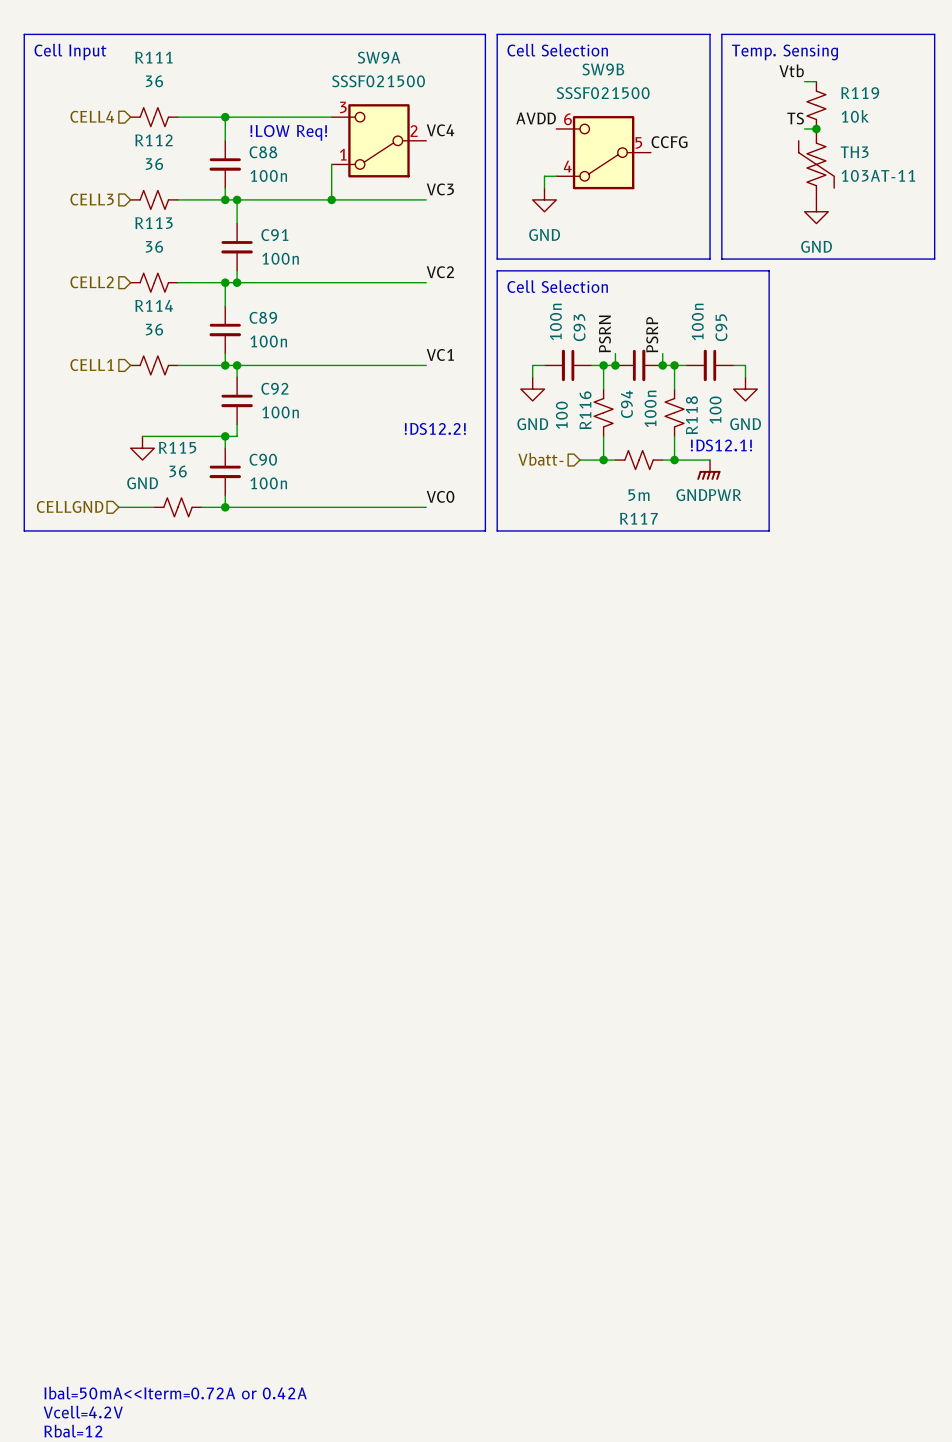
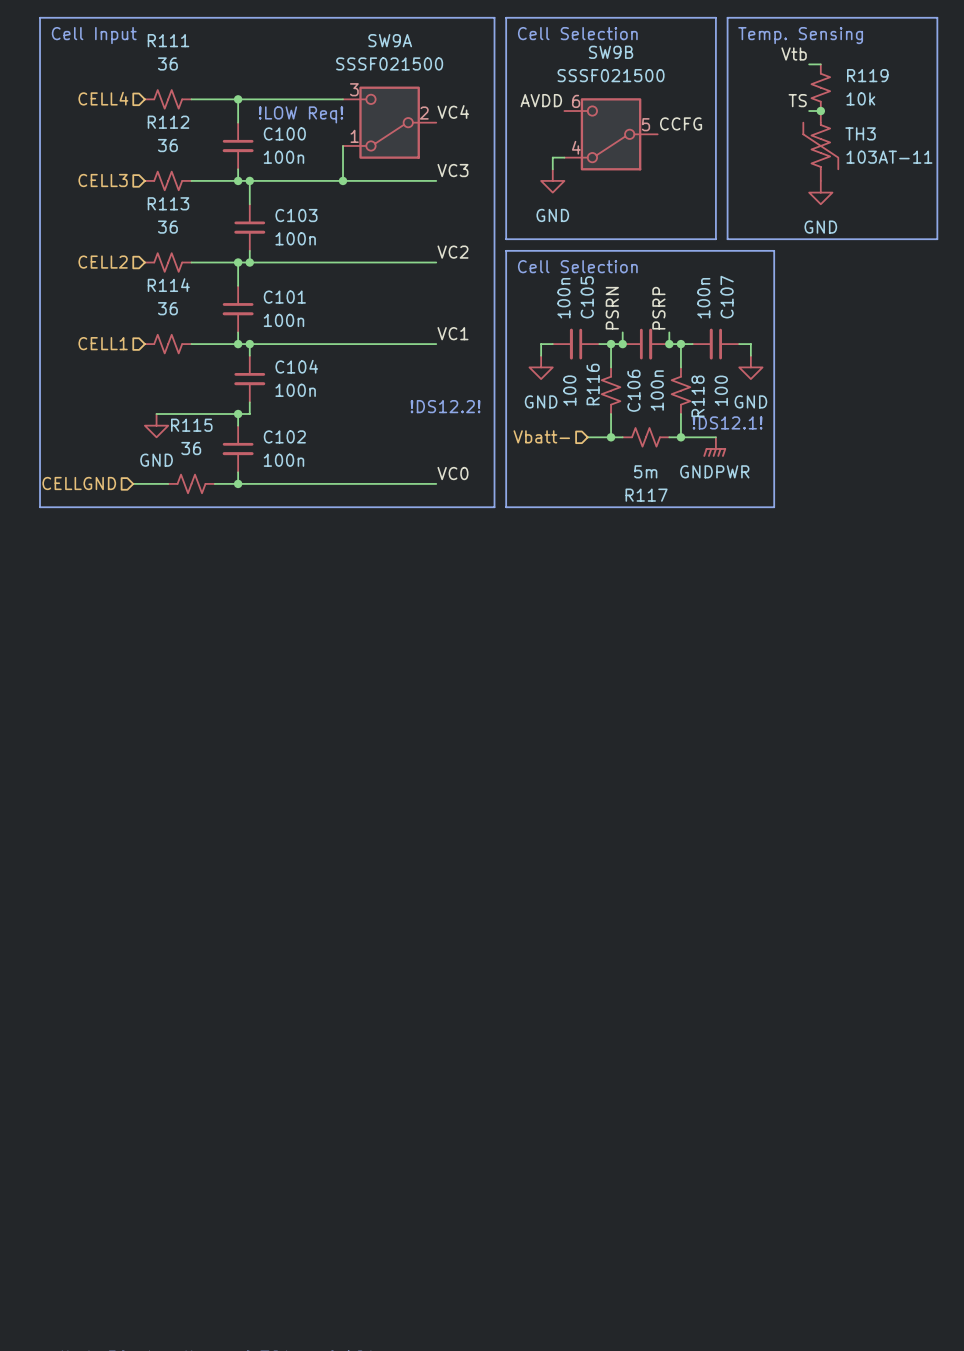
C88 name: C88 (263, 152) -> C100 (284, 133)
C91 name: C91 (274, 235) -> C103 (296, 215)
C89 name: C89 (263, 317) -> C101 (284, 297)
C93 name: C93 (579, 327) -> C105 (587, 297)
C95 name: C95 (721, 327) -> C107 (727, 297)
C92 name: C92 (274, 388) -> C104 (296, 366)
C94 name: C94 (626, 404) -> C106 (633, 390)
C90 name: C90 (263, 459) -> C102 (284, 436)

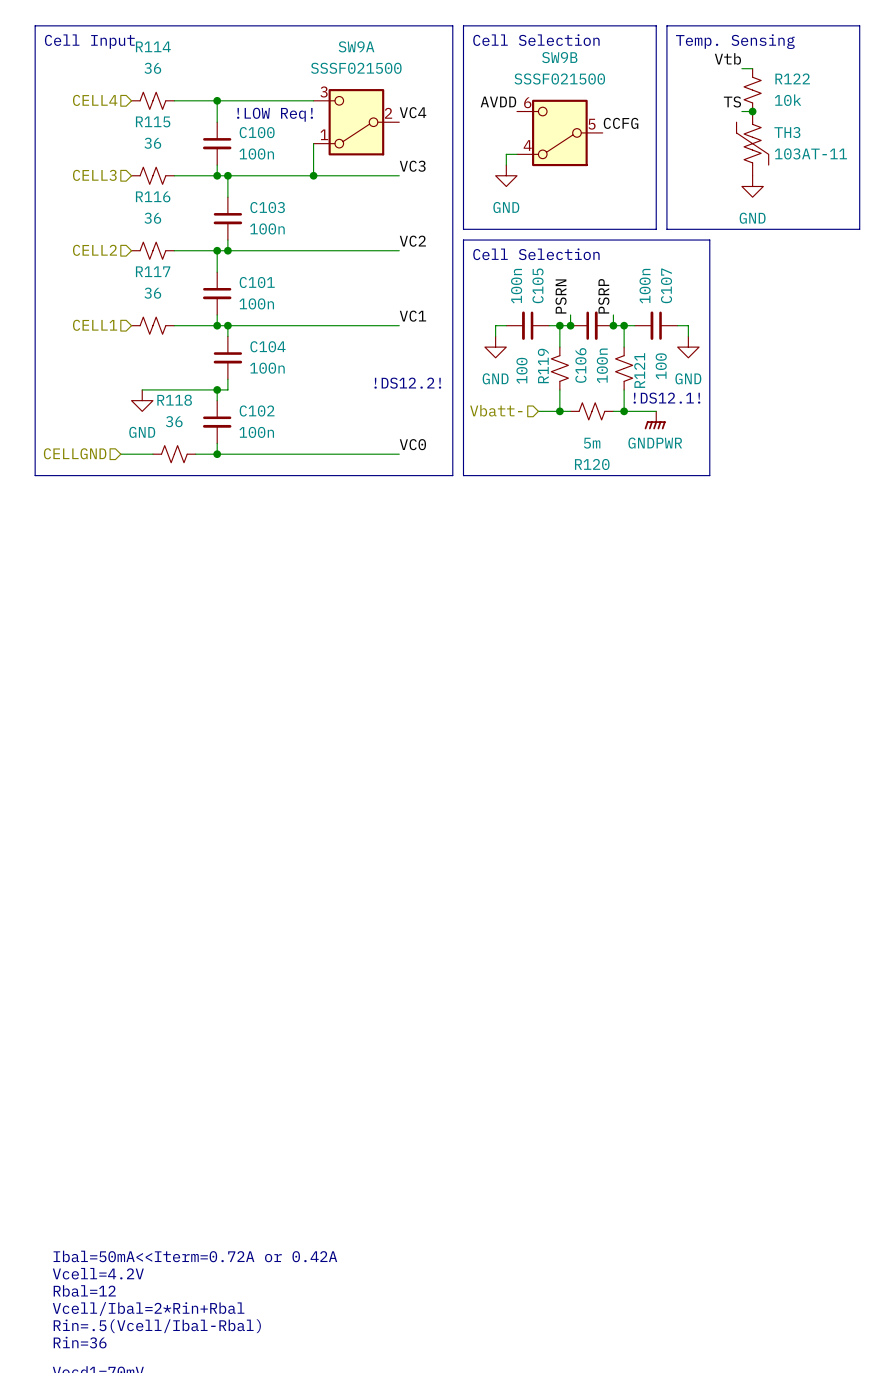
R111 name: R111 (168, 40) -> R114 (153, 46)
R119 name: R119 (867, 75) -> R122 (792, 78)
R112 name: R112 (168, 122) -> R115 (153, 121)
R113 name: R113 (168, 203) -> R116 (153, 196)
R114 name: R114 (168, 285) -> R117 (153, 271)
R116 name: R116 (593, 384) -> R119 (543, 365)
R118 name: R118 (698, 396) -> R121 (639, 370)
R115 name: R115 (191, 425) -> R118 (174, 400)
R117 name: R117 (646, 495) -> R120 (592, 464)

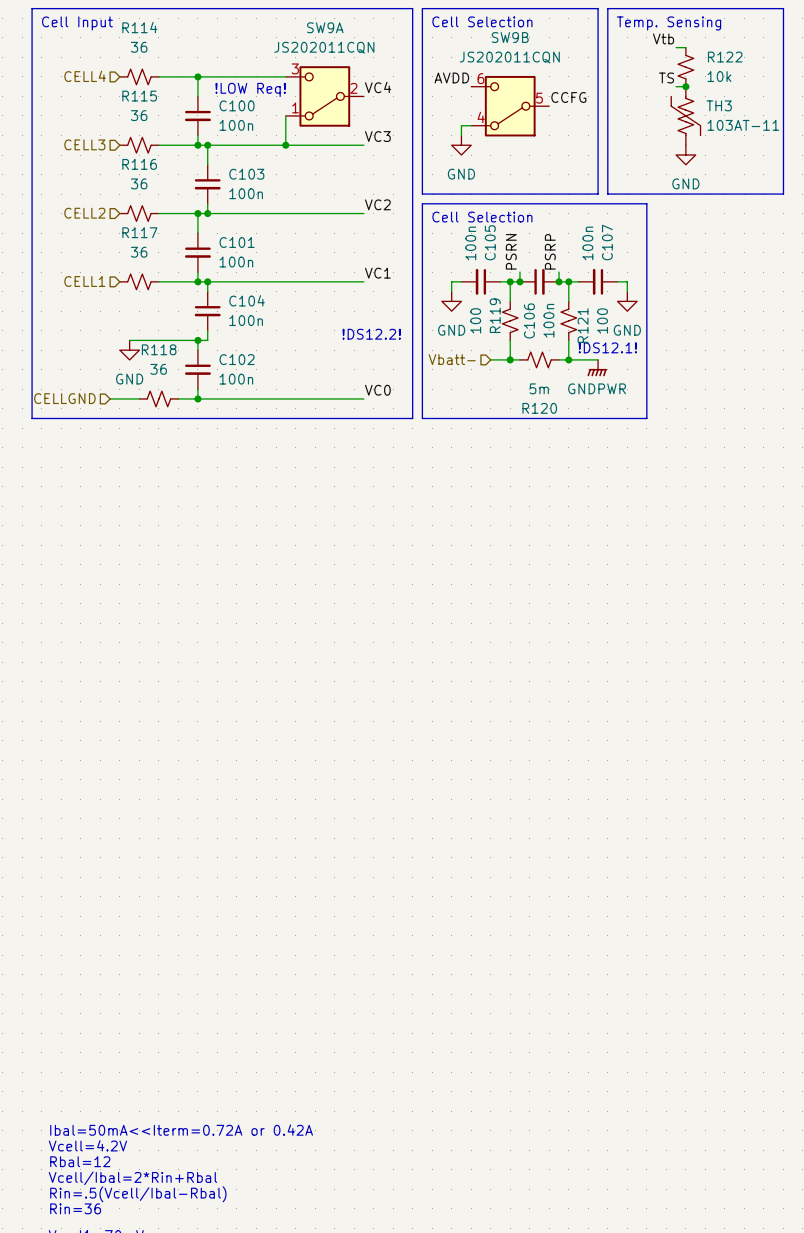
SW9A value: SSSF021500 (356, 68) -> JS202011CQN (324, 47)
SW9B value: SSSF021500 (559, 79) -> JS202011CQN (509, 57)

